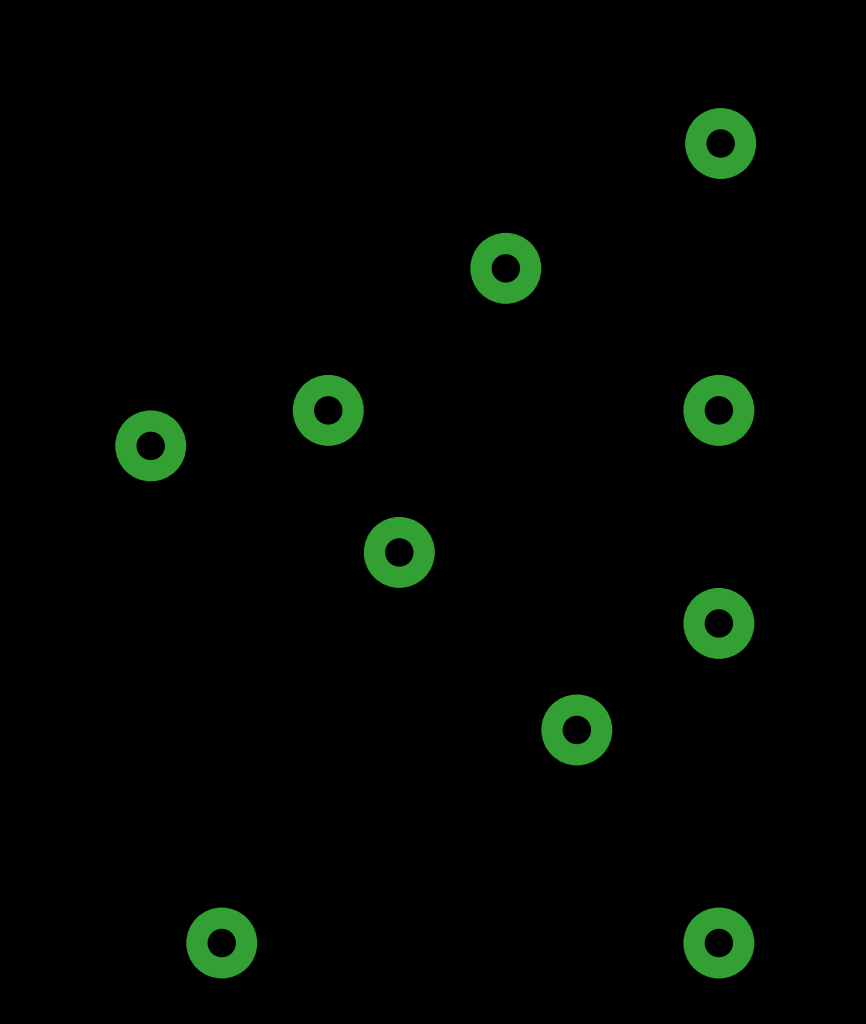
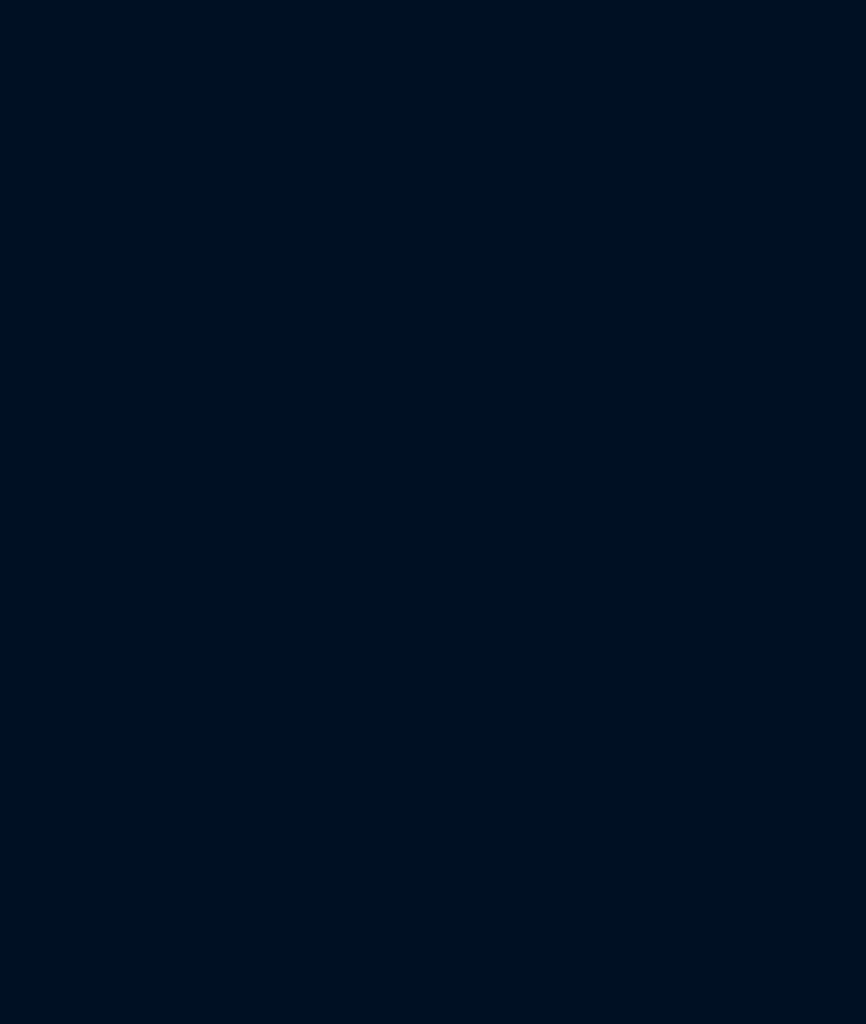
part: (720, 143) -> none
part: (505, 268) -> none
part: (328, 410) -> none
part: (718, 410) -> none
part: (150, 445) -> none
part: (399, 552) -> none
part: (718, 623) -> none
part: (576, 729) -> none
part: (221, 943) -> none
part: (718, 943) -> none

